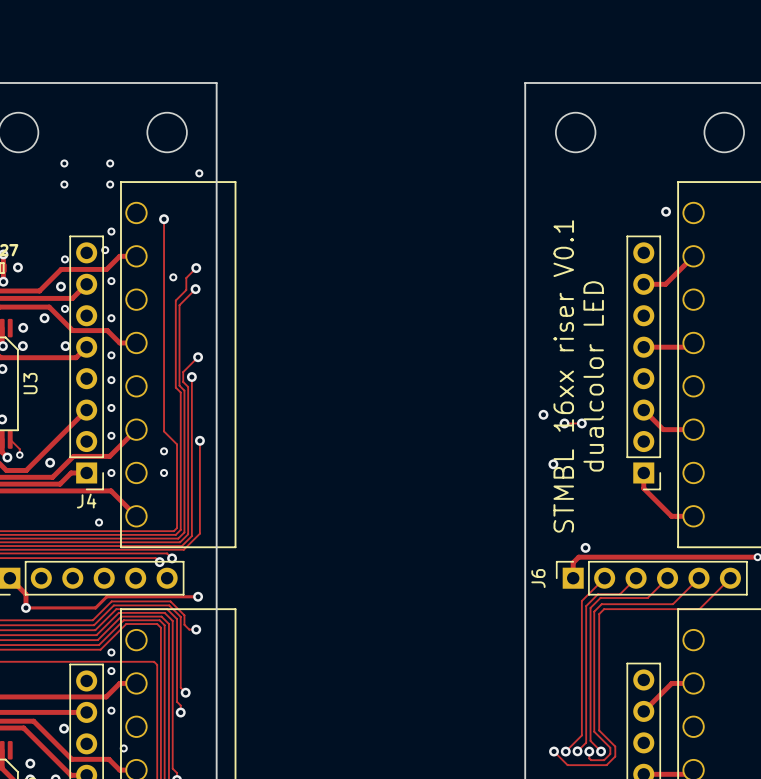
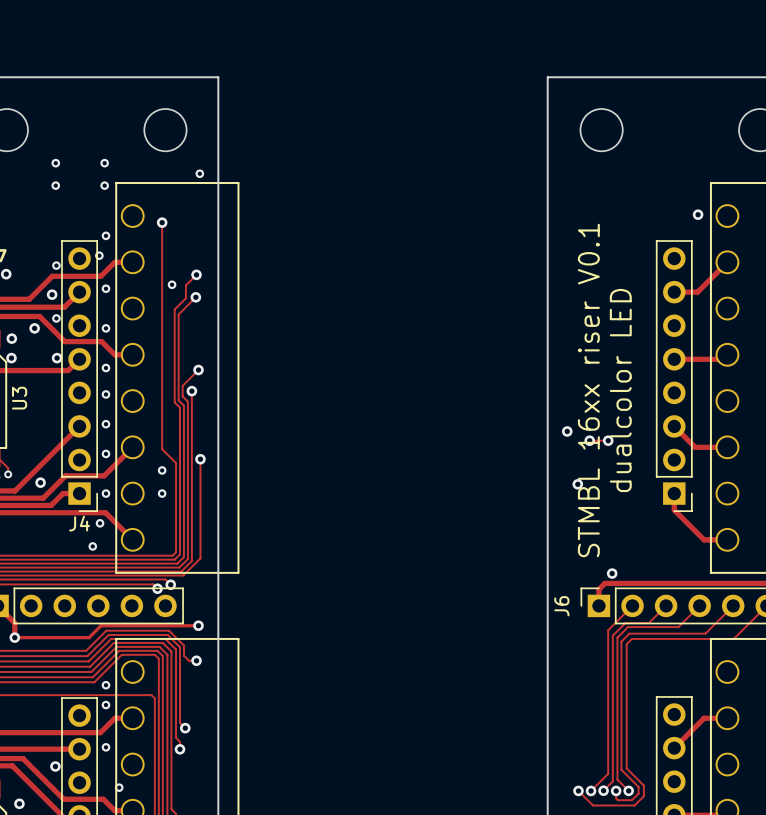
via: none -> (100, 523)

